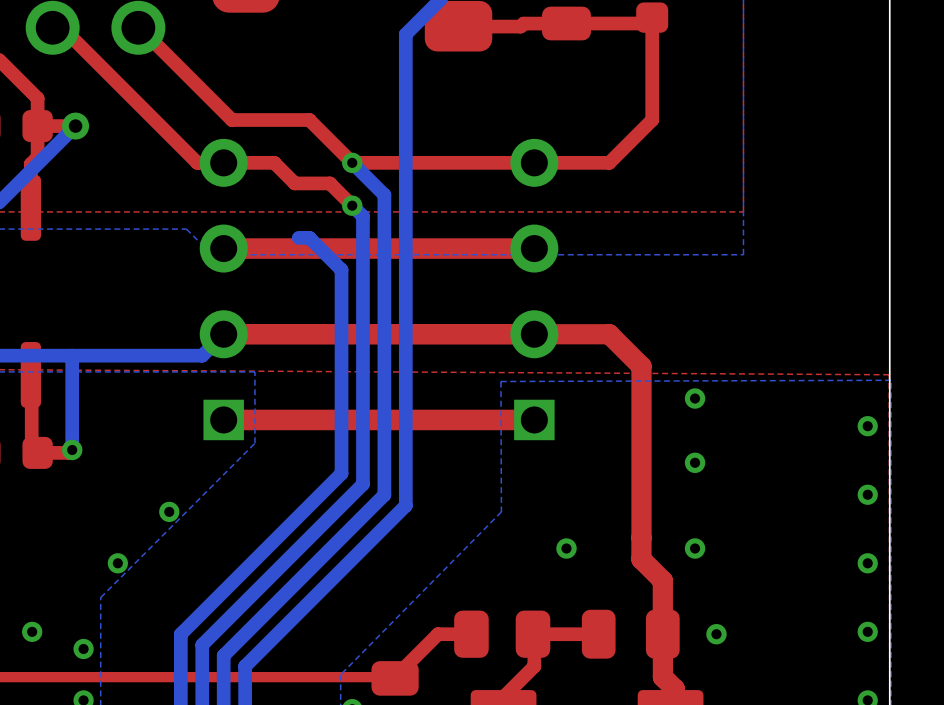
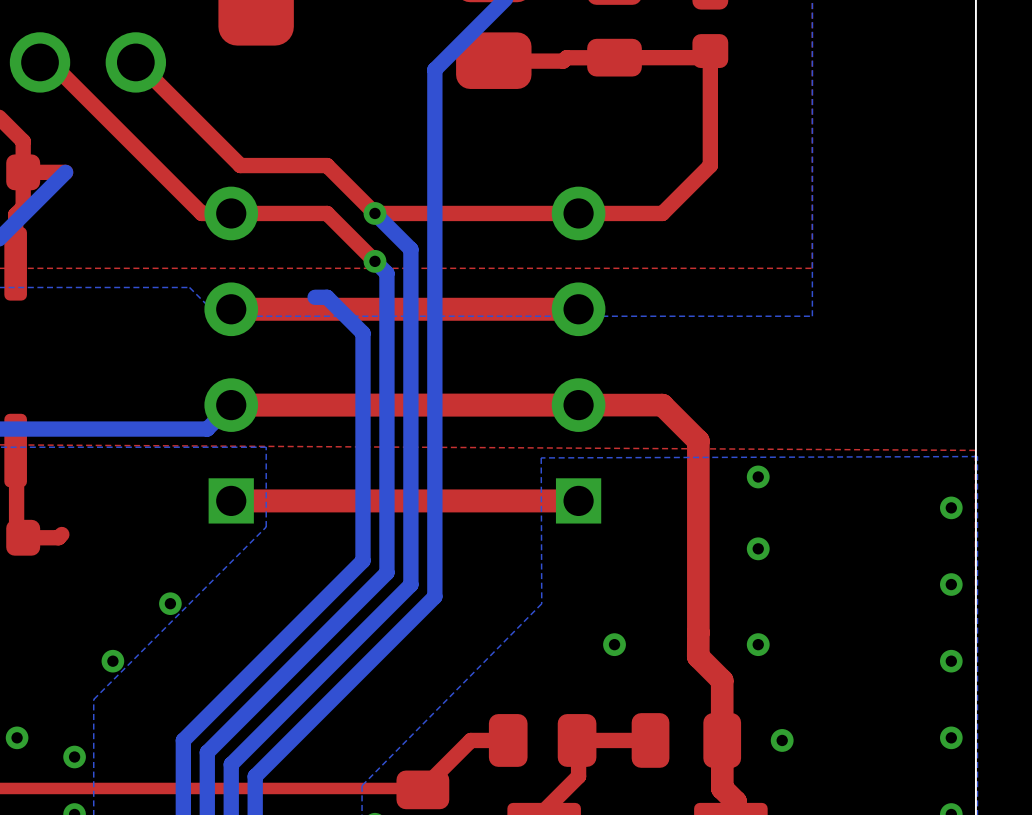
via: (75, 126) -> none
top track: (274, 162) (294, 183) (329, 183) -> (287, 213) (327, 213) (350, 236)
bottom track: (72, 355) (72, 449) -> none
via: (72, 449) -> none

